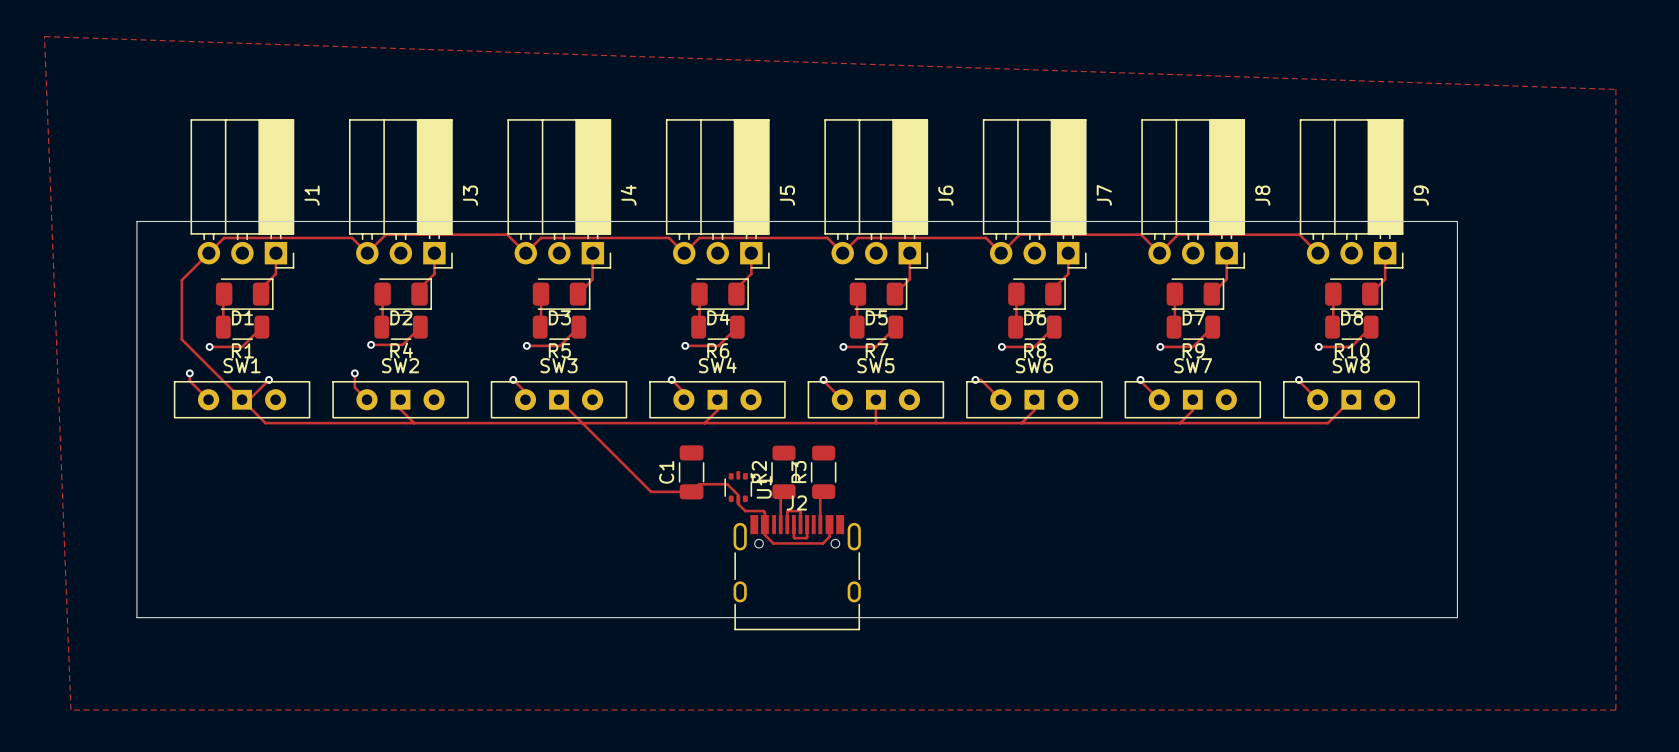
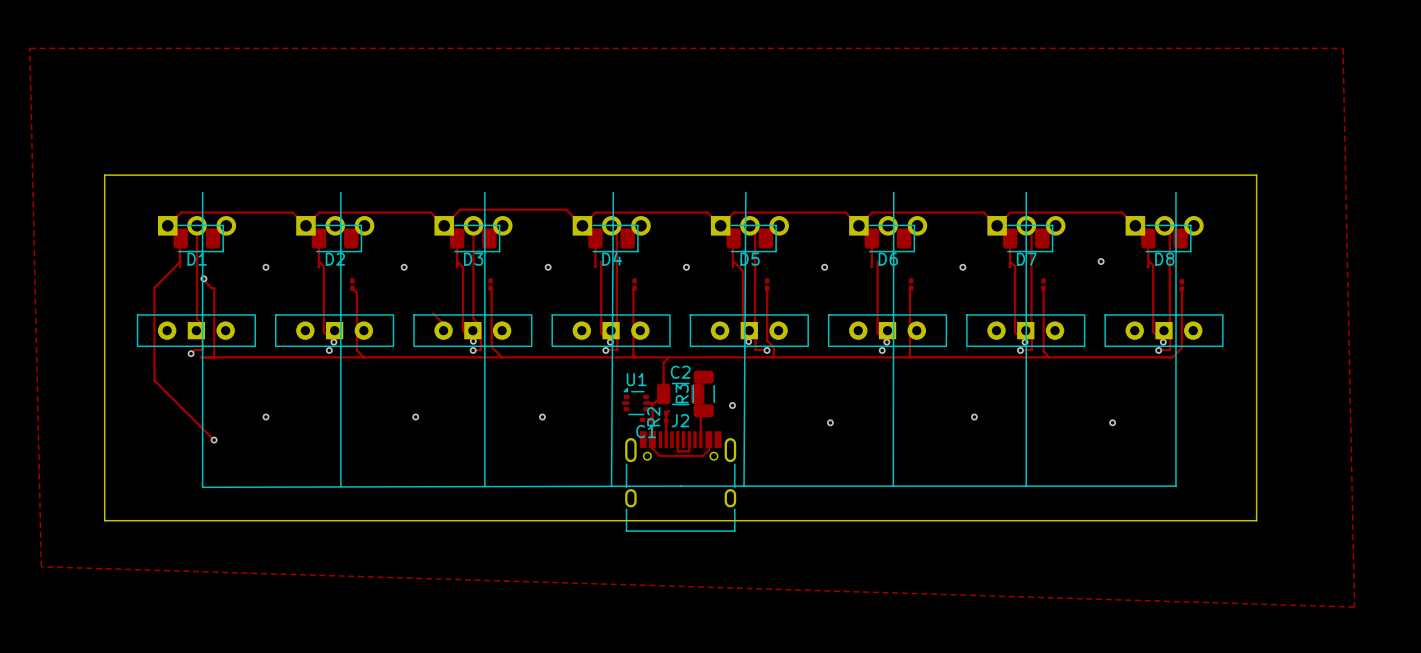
zone outline: (44, 36) (70, 710) (1615, 710) (1615, 89) (44, 36) -> (29, 48) (41, 566) (1354, 607) (1343, 48) (29, 48)
J1 side: top (242, 193) -> bottom (197, 225)
J3: (400, 193) -> none
J4: (559, 193) -> none
J5: (717, 193) -> none
J6: (876, 193) -> none
J7: (1034, 193) -> none
J8: (1193, 193) -> none
J9: (1351, 193) -> none
line: none -> (202, 192) (202, 487) (1175, 486) (1175, 192)
line: none -> (340, 192) (340, 486)
line: none -> (484, 192) (484, 486)
line: none -> (613, 192) (611, 486)
line: none -> (745, 192) (744, 486)
line: none -> (893, 192) (893, 486)
line: none -> (1026, 192) (1026, 486)
track: (275, 253) (275, 273) (261, 288) (261, 294) -> none
track: (434, 253) (434, 273) (419, 288) (420, 294) -> none
track: (592, 253) (592, 279) (578, 294) -> none
track: (751, 253) (751, 273) (736, 288) (737, 294) -> none
track: (909, 253) (909, 279) (895, 294) -> none
track: (1068, 253) (1068, 273) (1053, 288) (1054, 294) -> none
track: (1226, 253) (1226, 279) (1212, 294) -> none
track: (1318, 253) (1299, 234) (1178, 234) (1159, 253) (1141, 234) (1019, 234) (1001, 253) (985, 237) (857, 237) (842, 253) (827, 237) (699, 237) (684, 253) (669, 237) (540, 237) (525, 253) (507, 234) (385, 234) (367, 253) (352, 237) (224, 237) (181, 280) (181, 339) (265, 423) (1327, 423) (1351, 399) -> none
track: (1385, 253) (1385, 279) (1371, 294) -> none
track: none -> (167, 225) (181, 212) (292, 212) (306, 225) (319, 212) (430, 212) (444, 225) (460, 209) (566, 209) (582, 225) (595, 212) (707, 212) (720, 225) (733, 212) (845, 212) (858, 225) (872, 212) (983, 212) (997, 225) (1010, 212) (1122, 212) (1135, 225)
track: none -> (197, 225) (197, 319) (202, 325) (202, 349) (194, 349) (191, 353)
part: none -> (335, 225)
track: none -> (473, 225) (473, 318) (480, 326) (480, 349) (473, 350)
part: none -> (473, 225)
track: none -> (611, 225) (616, 230) (617, 349) (605, 350)
part: none -> (611, 225)
track: none -> (749, 225) (755, 230) (755, 349) (767, 350)
part: none -> (749, 225)
part: none -> (888, 225)
track: none -> (1026, 225) (1031, 230) (1031, 349) (1020, 350)
part: none -> (1026, 225)
track: none -> (1164, 225) (1169, 230) (1170, 349) (1158, 350)
part: none -> (1164, 225)
track: none -> (180, 261) (154, 287) (154, 380) (214, 440)
track: none -> (318, 261) (323, 266) (323, 332) (333, 342)
track: none -> (457, 261) (462, 267) (462, 330) (473, 341)
track: none -> (601, 261) (601, 332) (610, 342)
track: none -> (733, 261) (742, 270) (742, 335) (748, 341)
track: none -> (877, 261) (877, 332) (886, 342)
track: none -> (1010, 261) (1014, 266) (1014, 332) (1025, 342)
via: none -> (1101, 261)
track: none -> (1149, 261) (1153, 265) (1153, 332) (1163, 342)
track: (261, 326) (242, 346) (209, 346) -> none
R1: (242, 327) -> none
via: none -> (265, 267)
R4: (401, 327) -> none
track: (420, 327) (402, 344) (371, 344) -> none
via: none -> (404, 267)
R5: (559, 327) -> none
track: (578, 327) (560, 345) (526, 345) -> none
via: none -> (548, 267)
R6: (717, 327) -> none
track: (737, 327) (718, 345) (685, 345) -> none
via: none -> (686, 267)
R7: (876, 327) -> none
track: (895, 327) (875, 346) (843, 346) -> none
via: none -> (824, 267)
R8: (1034, 327) -> none
track: (1054, 327) (1034, 346) (1001, 346) -> none
via: none -> (962, 267)
R9: (1193, 327) -> none
track: (1212, 327) (1192, 346) (1160, 346) -> none
R10: (1351, 327) -> none
track: (1371, 327) (1351, 346) (1318, 346) -> none
track: none -> (203, 278) (211, 288) (214, 288)
via: none -> (203, 278)
via: (371, 344) -> none
via: (526, 345) -> none
via: (685, 345) -> none
via: (209, 346) -> none
part: none -> (352, 284)
part: none -> (490, 284)
part: none -> (634, 284)
via: (843, 346) -> none
part: none -> (767, 284)
via: (1001, 346) -> none
part: none -> (911, 284)
via: (1160, 346) -> none
part: none -> (1043, 284)
via: (1318, 346) -> none
part: none -> (1181, 285)
track: none -> (214, 288) (214, 357)
track: none -> (352, 288) (356, 292) (356, 350) (363, 357)
track: none -> (490, 288) (491, 346) (502, 357)
track: none -> (634, 288) (634, 357)
track: none -> (767, 288) (767, 340) (773, 347) (772, 357)
track: none -> (911, 288) (911, 357)
track: none -> (1043, 288) (1043, 351) (1049, 357)
track: none -> (1181, 289) (1181, 348) (1172, 357) (200, 357)
SW1 name: SW1 (242, 365) -> none
SW2 name: SW2 (400, 365) -> none
SW3 name: SW3 (558, 365) -> none
SW4 name: SW4 (717, 365) -> none
SW5 name: SW5 (875, 365) -> none
SW6 name: SW6 (1034, 365) -> none
SW7 name: SW7 (1193, 365) -> none
SW8 name: SW8 (1351, 365) -> none
track: (189, 373) (189, 380) (208, 399) -> none
via: (189, 373) -> none
track: (354, 373) (354, 387) (366, 399) -> none
via: (354, 373) -> none
track: (269, 379) (249, 399) (242, 399) -> none
via: (269, 379) -> none
via: (513, 379) -> none
track: (671, 379) (683, 392) (683, 399) -> none
via: (671, 379) -> none
track: (823, 379) (842, 399) -> none
via: (823, 379) -> none
track: (975, 379) (981, 379) (1000, 399) -> none
via: (975, 379) -> none
track: (1140, 379) (1159, 399) -> none
via: (1140, 379) -> none
track: (1298, 379) (1317, 399) -> none
via: (1298, 379) -> none
track: (400, 399) (400, 409) (414, 423) -> none
track: (558, 399) (651, 491) (691, 491) (699, 484) (727, 484) (738, 495) (738, 504) (745, 511) (764, 512) -> (650, 403) (652, 404) (652, 417) (649, 419) (652, 422) (652, 428)
track: (717, 399) (717, 410) (704, 423) -> none
track: (875, 399) (876, 423) -> none
track: (1034, 399) (1034, 410) (1021, 423) -> none
track: (1192, 399) (1192, 410) (1180, 423) -> none
via: none -> (473, 341)
via: none -> (333, 342)
via: none -> (610, 342)
via: none -> (748, 341)
via: none -> (886, 342)
via: none -> (1025, 342)
via: none -> (1163, 342)
via: none -> (329, 350)
via: none -> (473, 350)
via: none -> (605, 350)
via: none -> (767, 350)
via: none -> (882, 350)
via: none -> (1020, 350)
via: none -> (1158, 350)
via: none -> (191, 353)
track: none -> (669, 357) (663, 362) (663, 393) (654, 403) (646, 403)
C1 footprint: [678, 445, 705, 500] -> [639, 417, 653, 423]
R2 footprint: [771, 445, 797, 500] -> [663, 410, 669, 424]
C1 name position: C1 (666, 472) -> C1 (646, 431)
C2: none -> (680, 393)
via: none -> (732, 405)
U1 rotation: 0° (740, 487) -> 90° counterclockwise (636, 401)
via: none -> (265, 417)
via: none -> (415, 417)
via: none -> (542, 417)
via: none -> (974, 417)
via: none -> (830, 422)
via: none -> (1112, 422)
track: (787, 524) (787, 511) (800, 511) (800, 524) -> none
via: none -> (214, 440)

